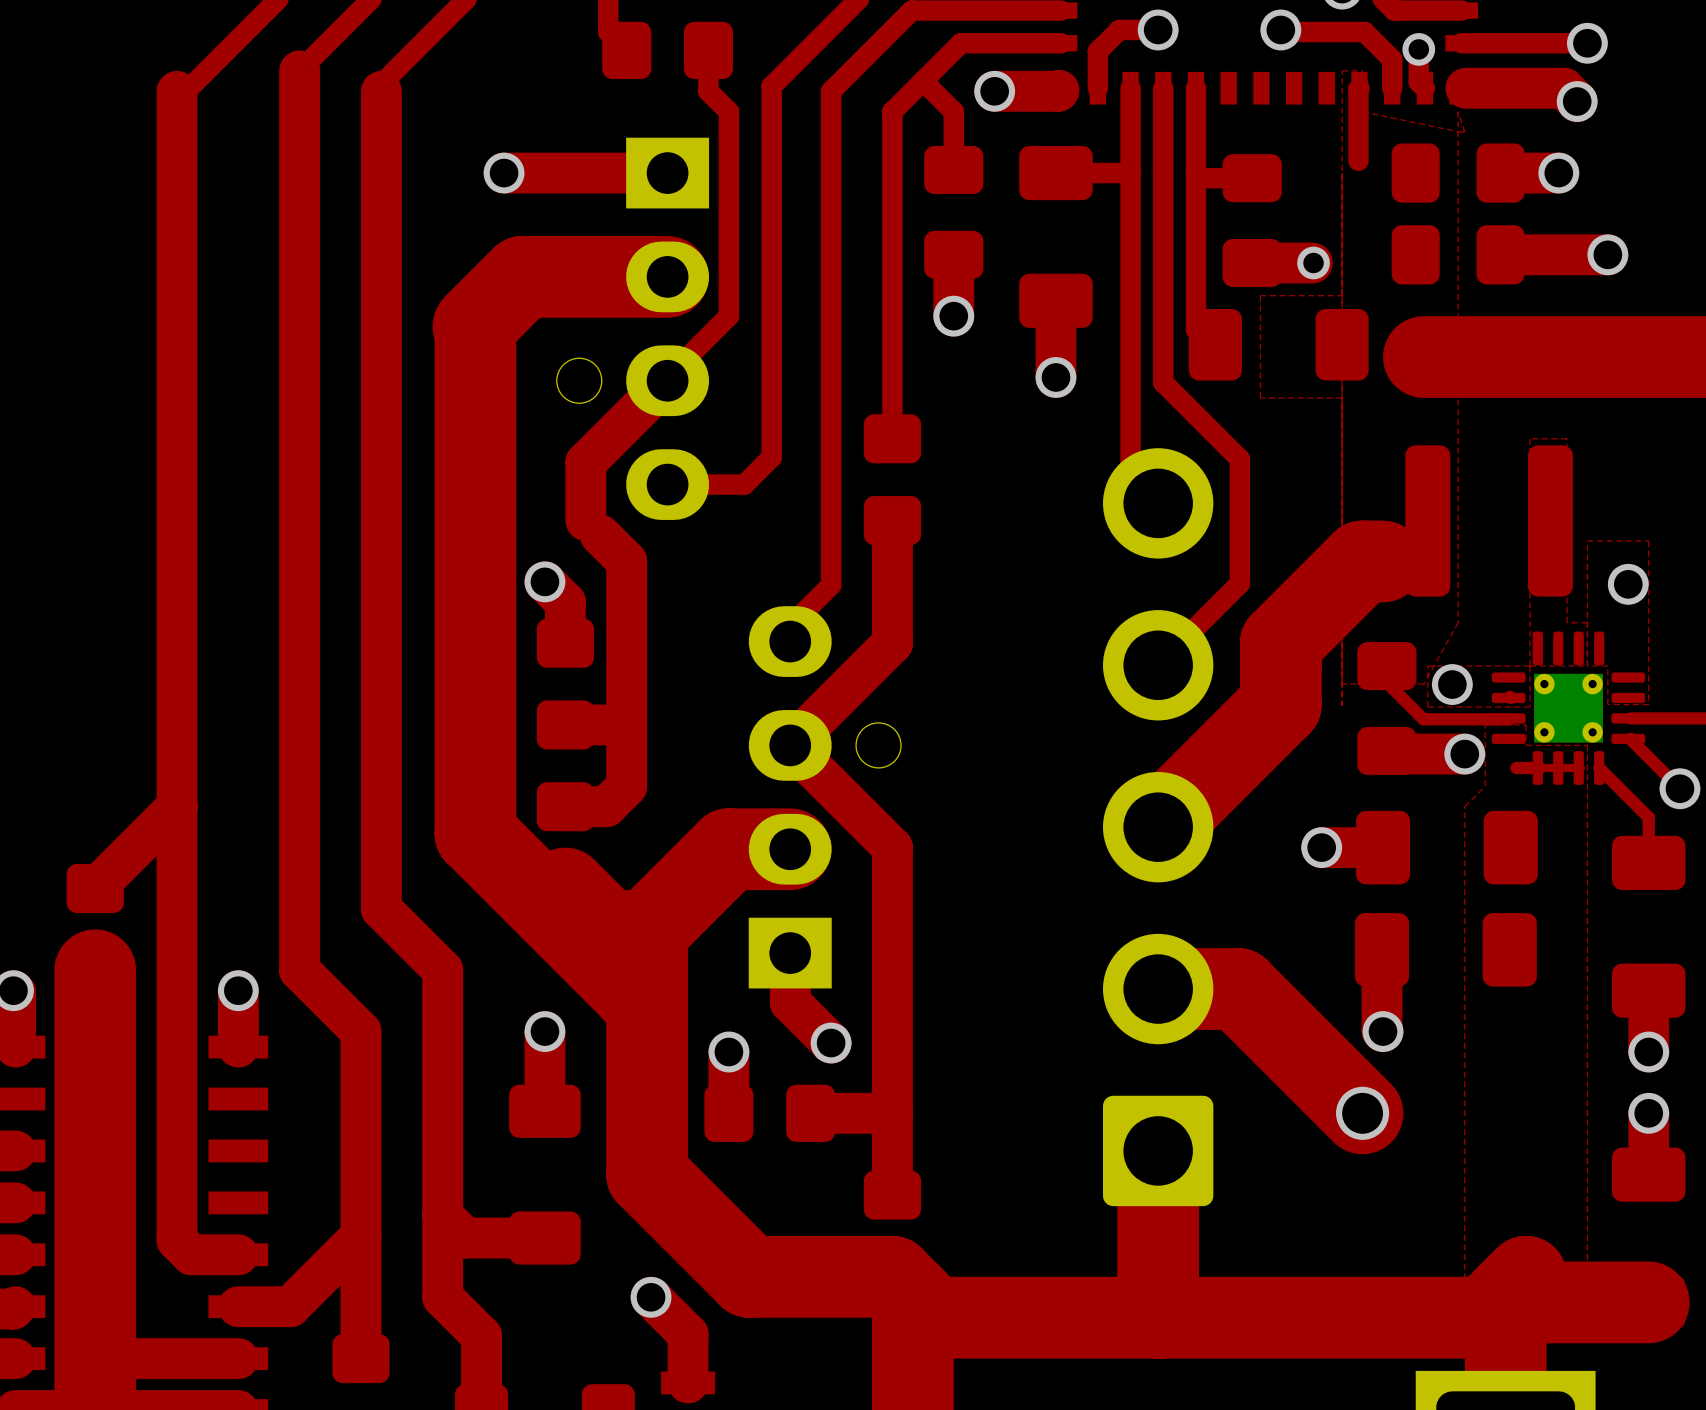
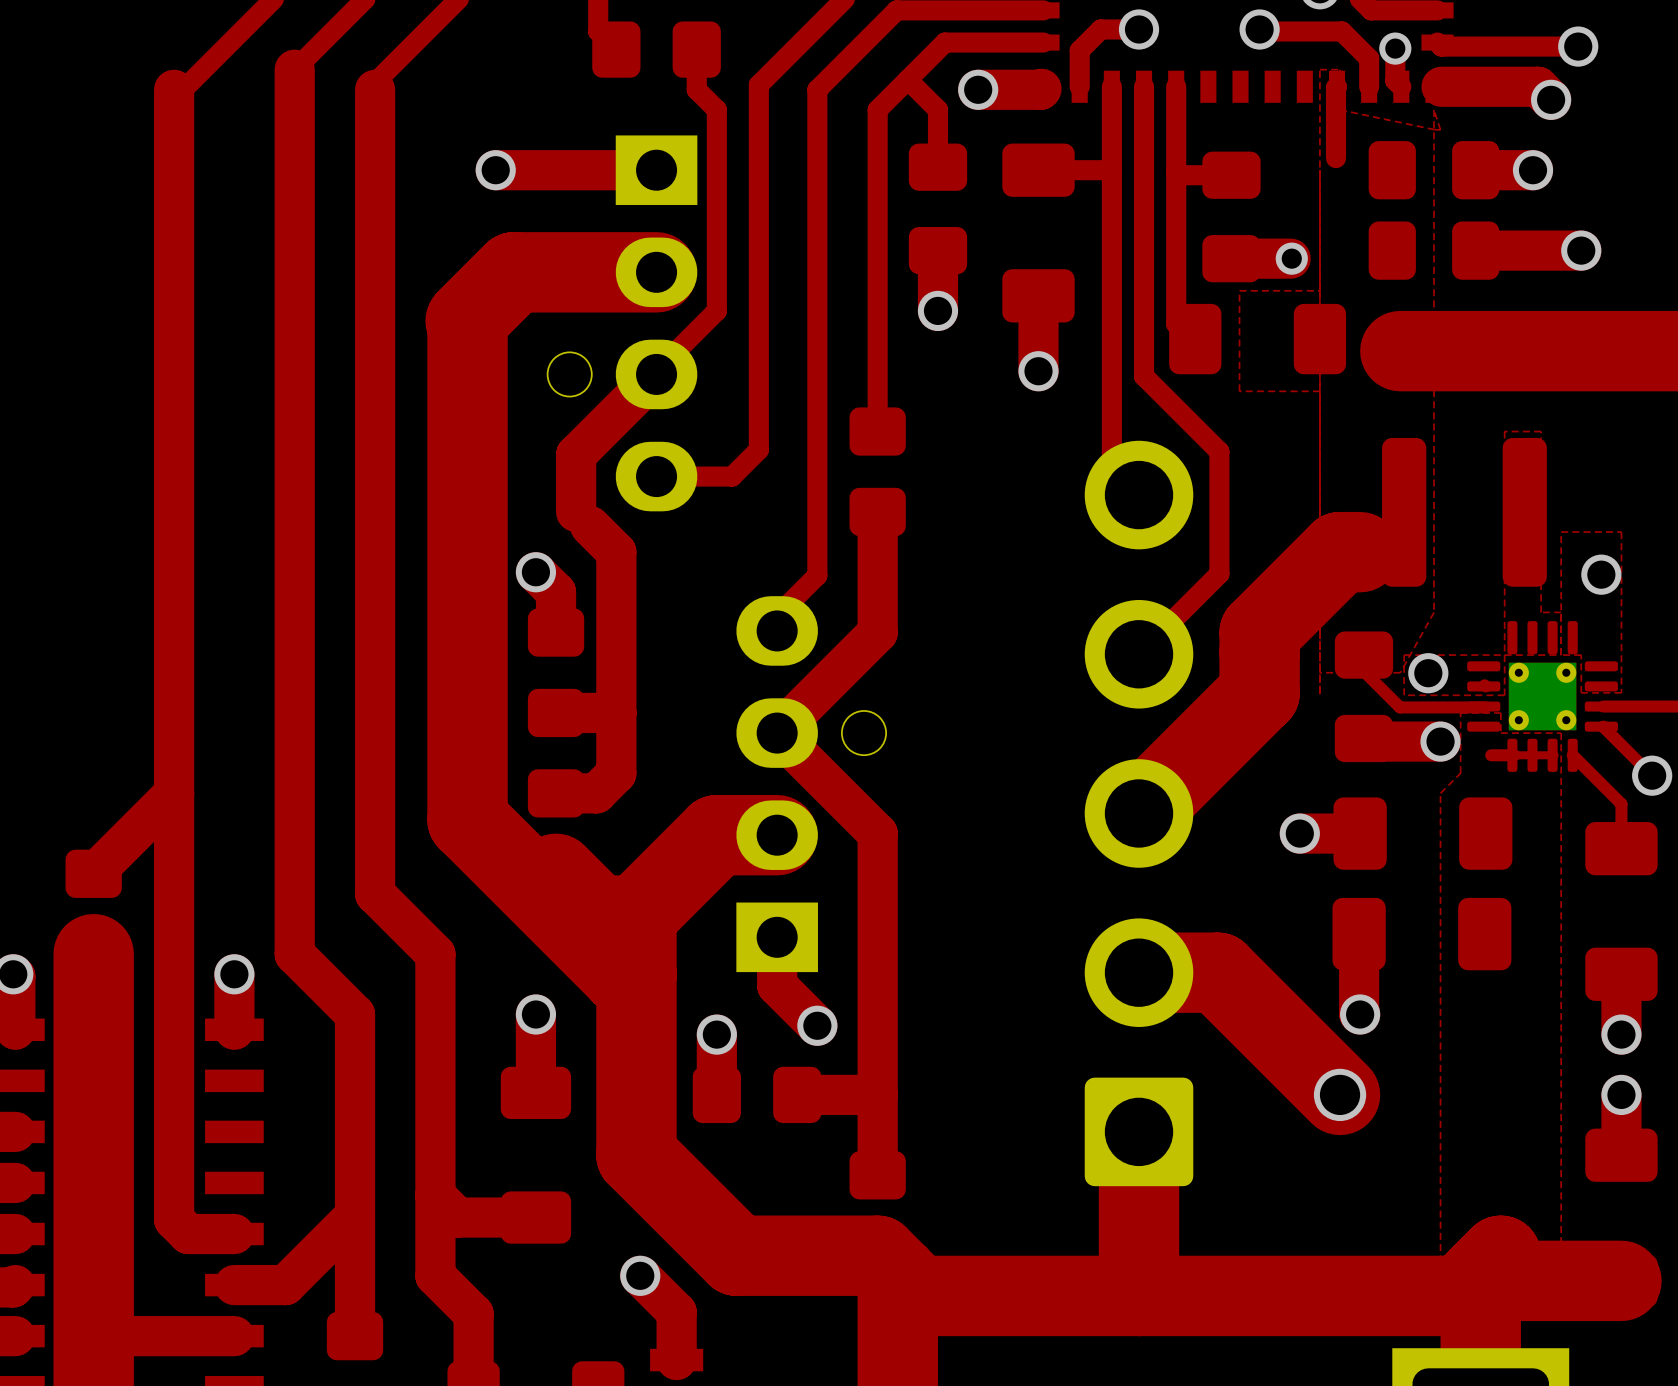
top track: (1587, 43) (1461, 43) -> (1578, 46) (1441, 46) (1437, 42)
via position: (1587, 43) -> (1578, 46)

